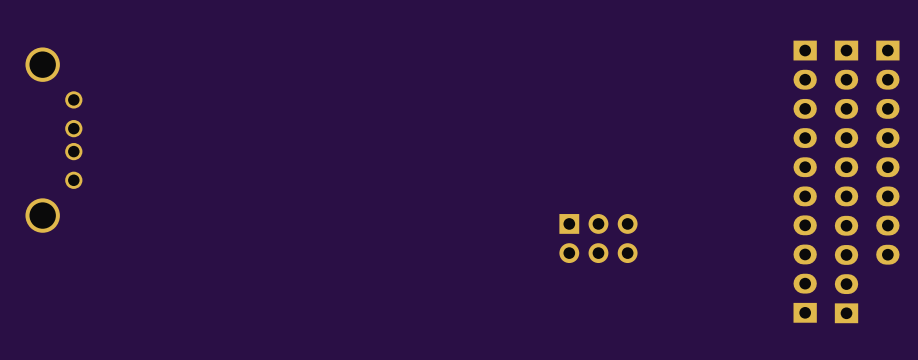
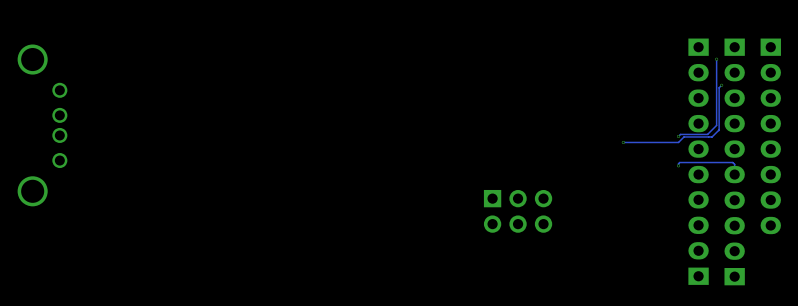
track: none -> (716, 59) (716, 125) (707, 134) (680, 134) (678, 136)
via: none -> (716, 59)
track: none -> (721, 85) (719, 87) (719, 130) (712, 136) (684, 136) (678, 142) (623, 142)
via: none -> (721, 85)
via: none -> (678, 136)
via: none -> (623, 142)
track: none -> (678, 165) (679, 162) (732, 162) (734, 164) (734, 174)
via: none -> (678, 165)

